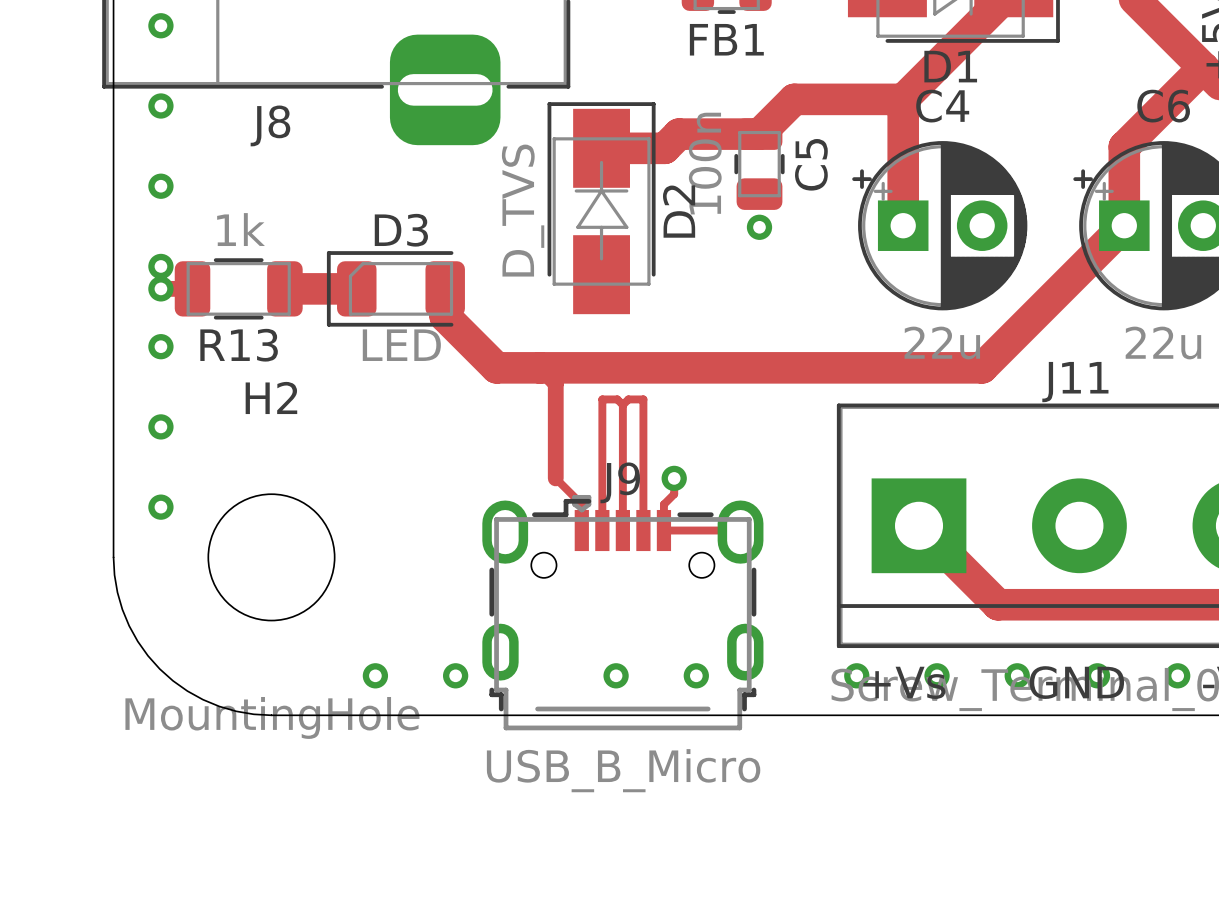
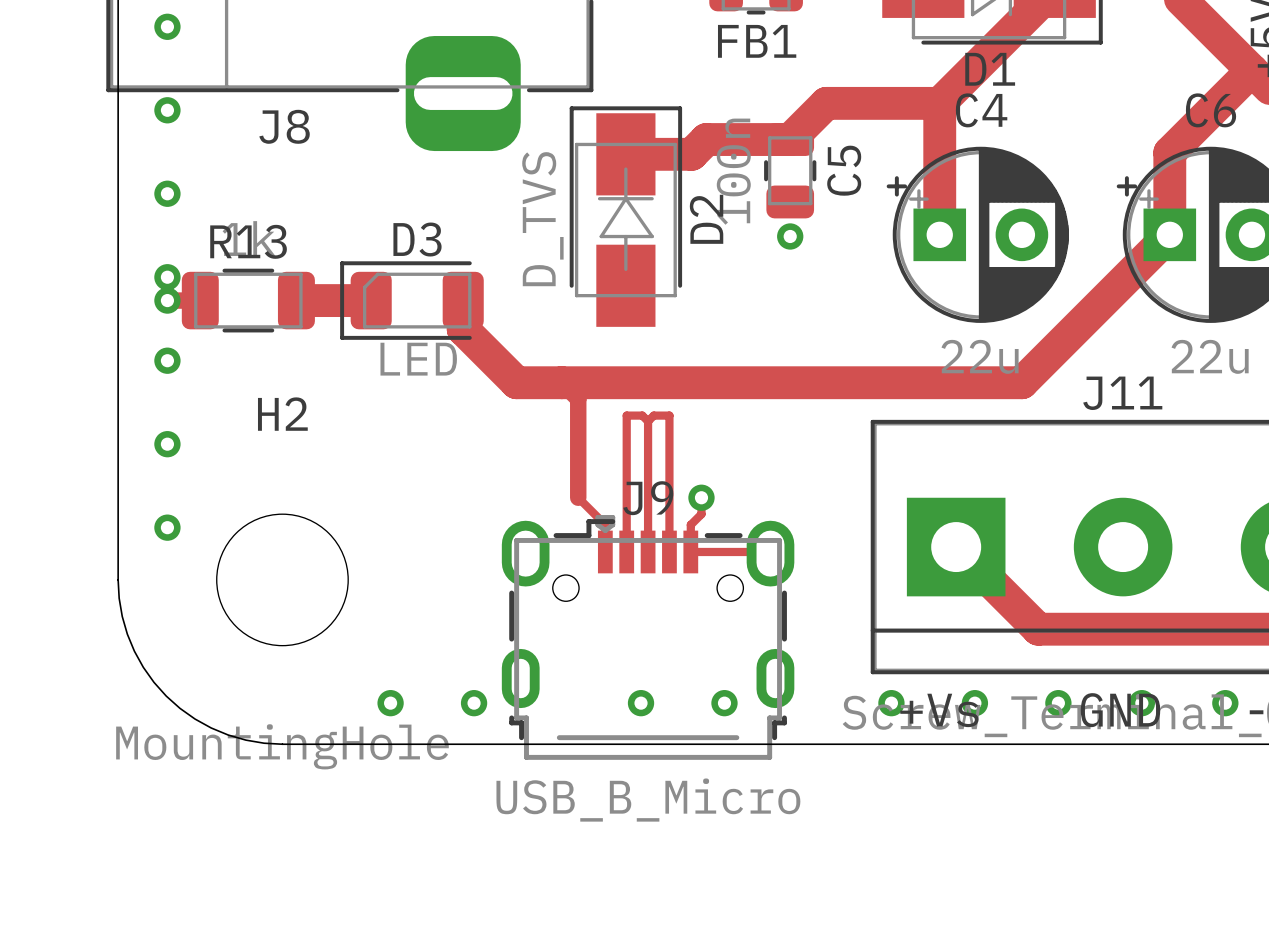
R13 name position: R13 (239, 345) -> R13 (248, 241)

